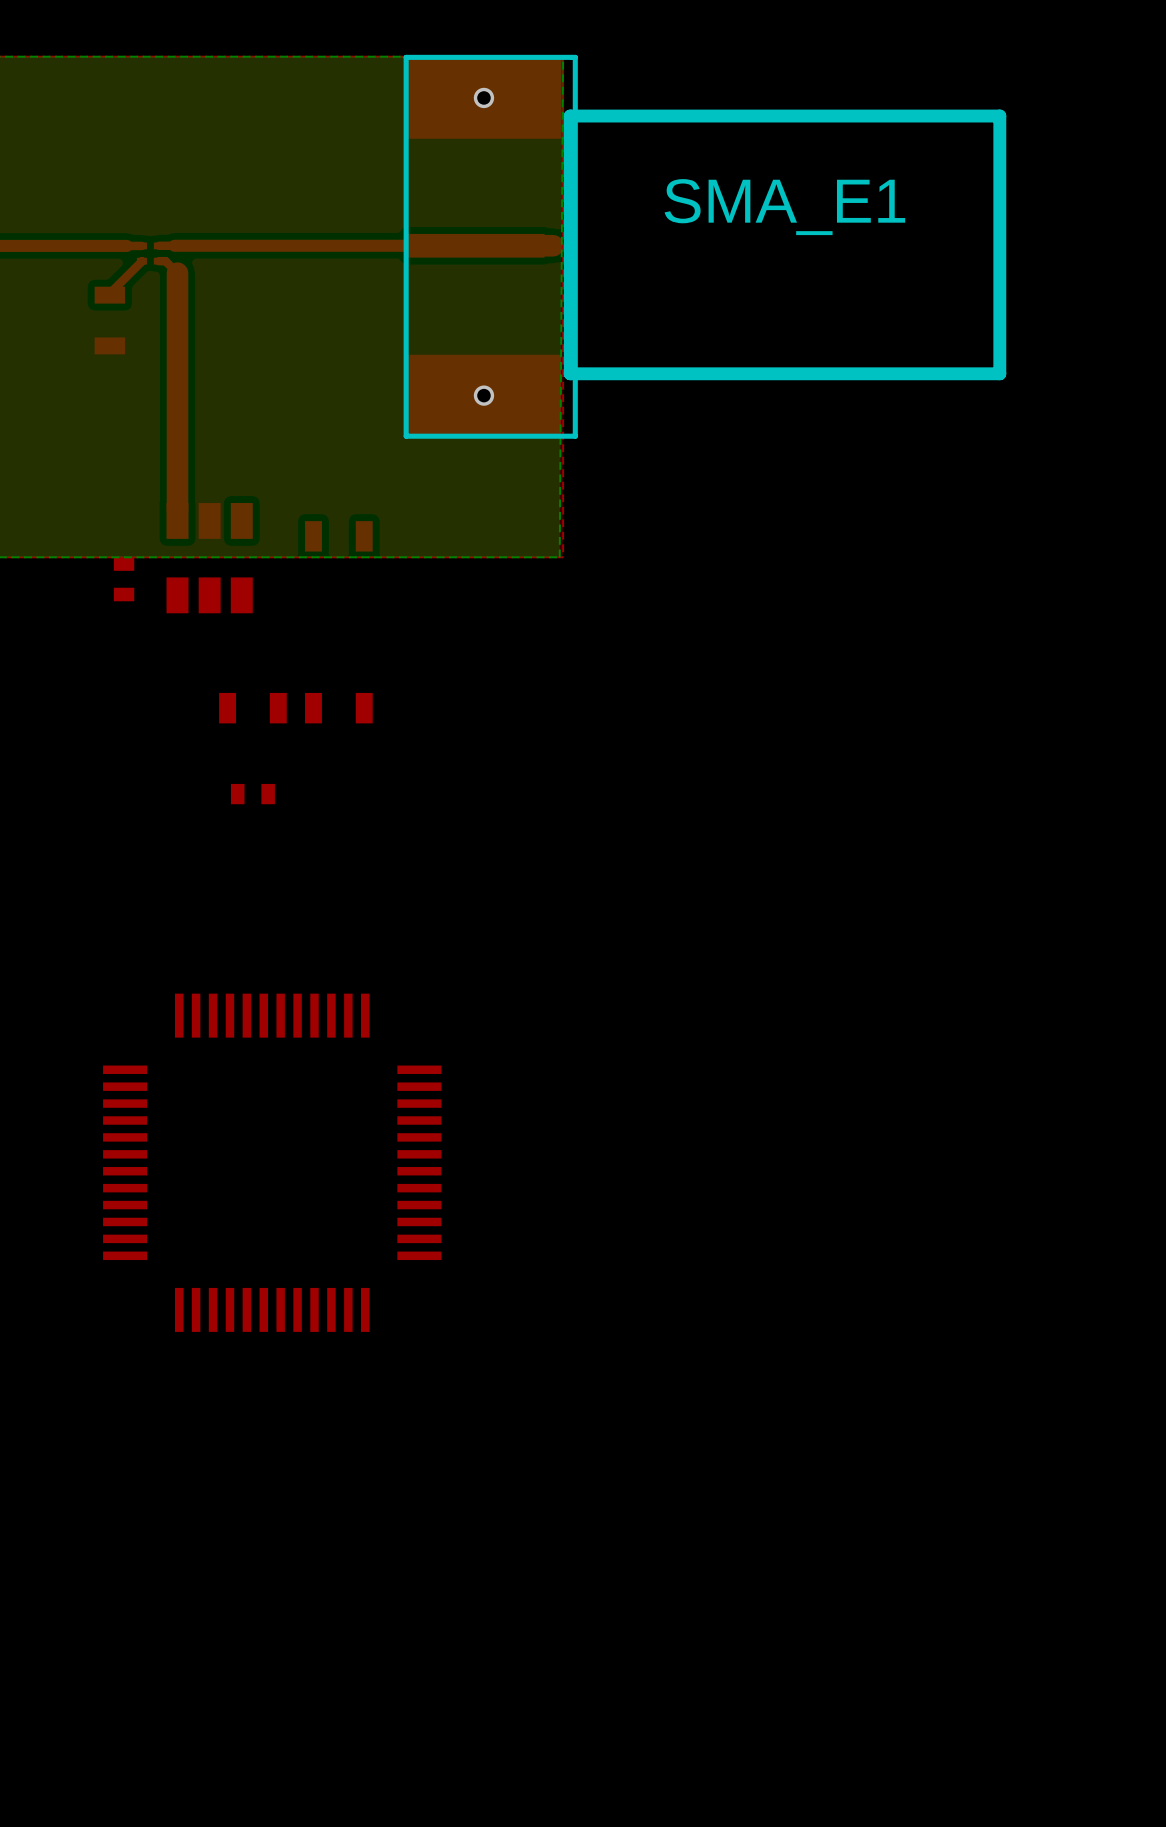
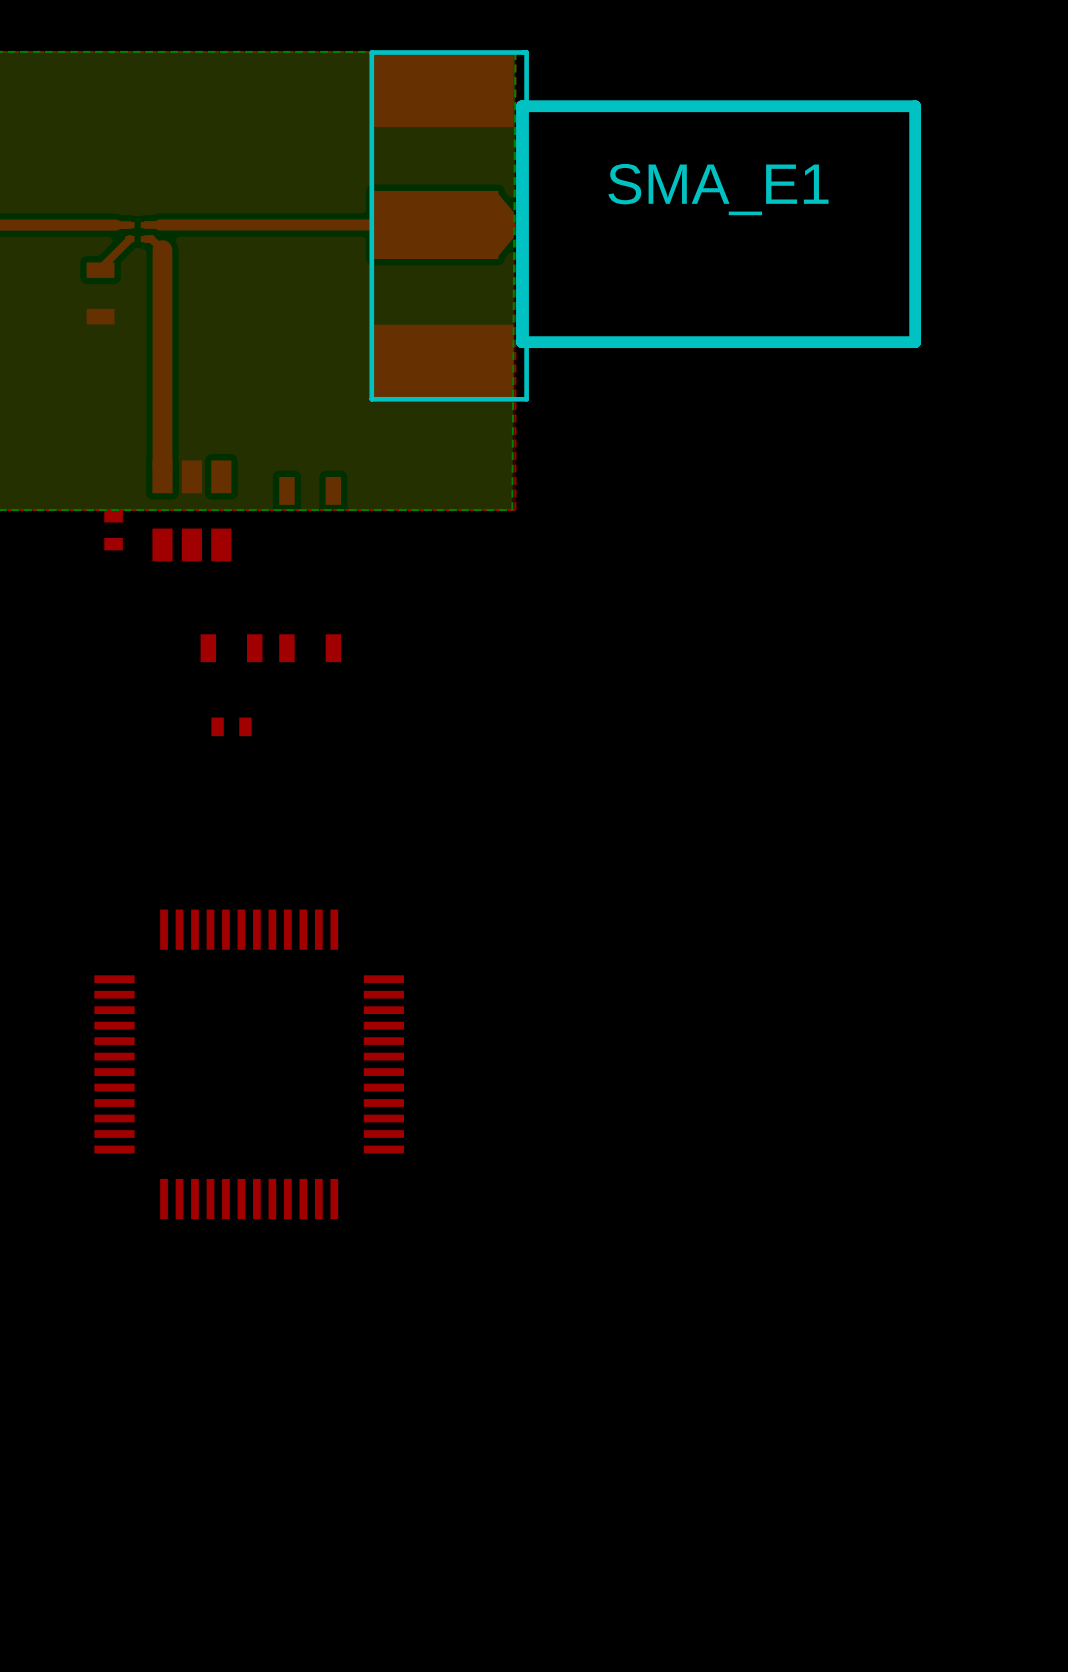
SMA_E1 footprint: [403, 54, 1007, 439] -> [369, 50, 922, 402]
via: (483, 97) -> none
via: (483, 395) -> none

